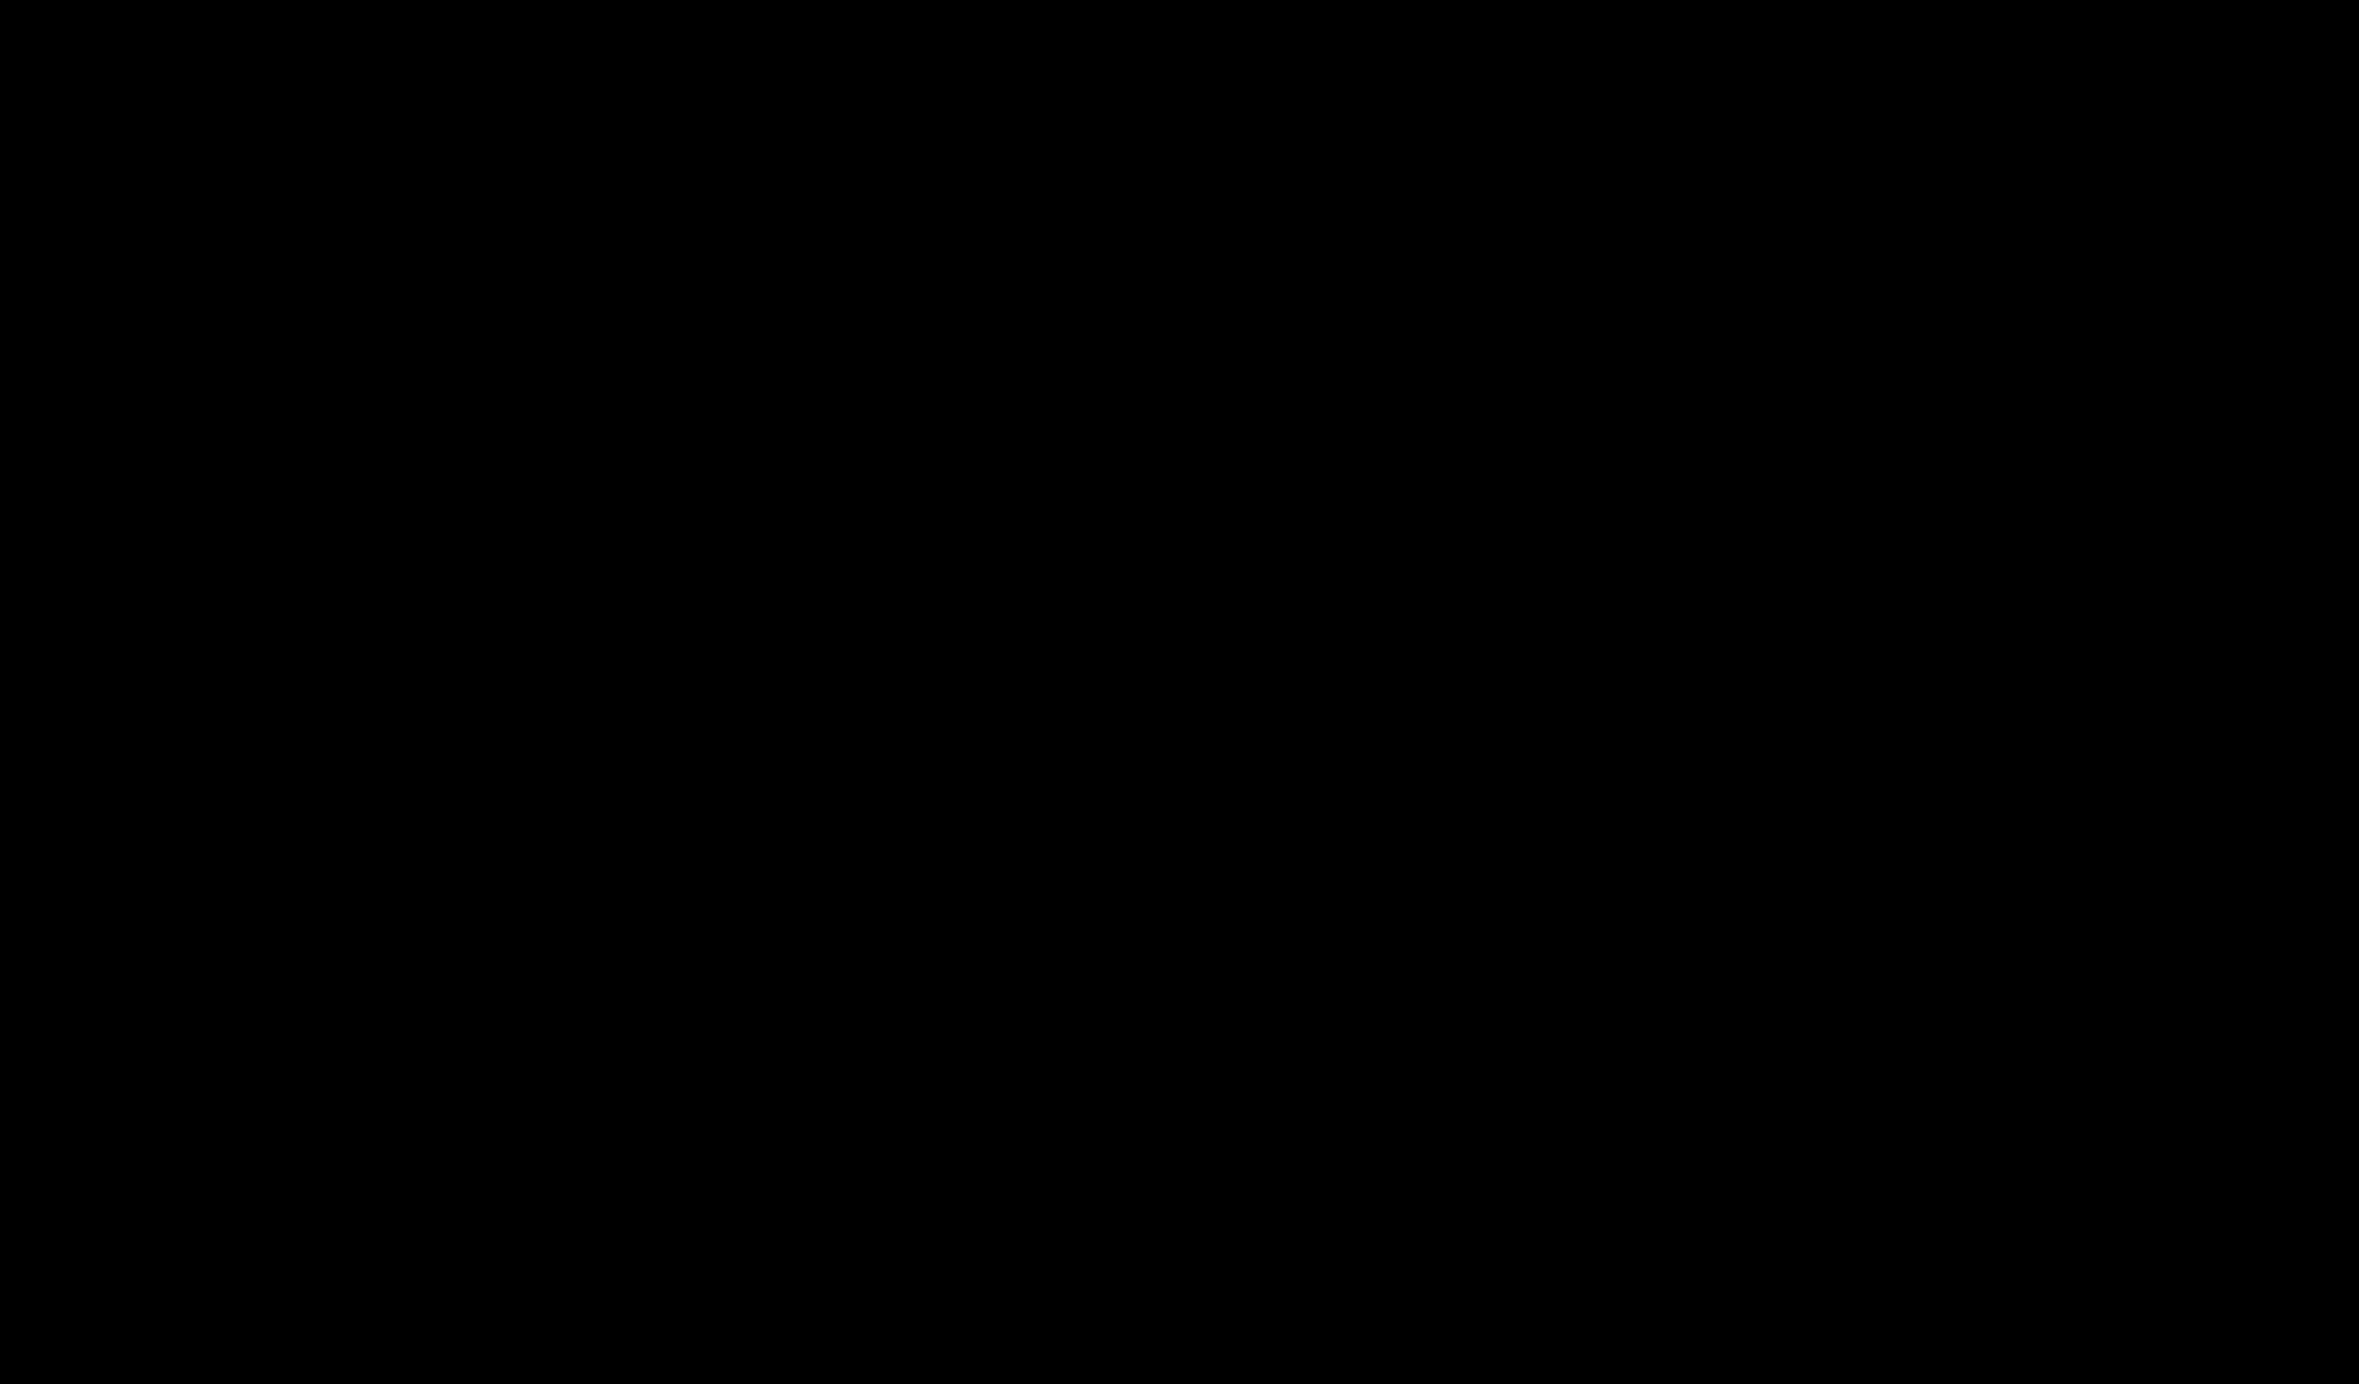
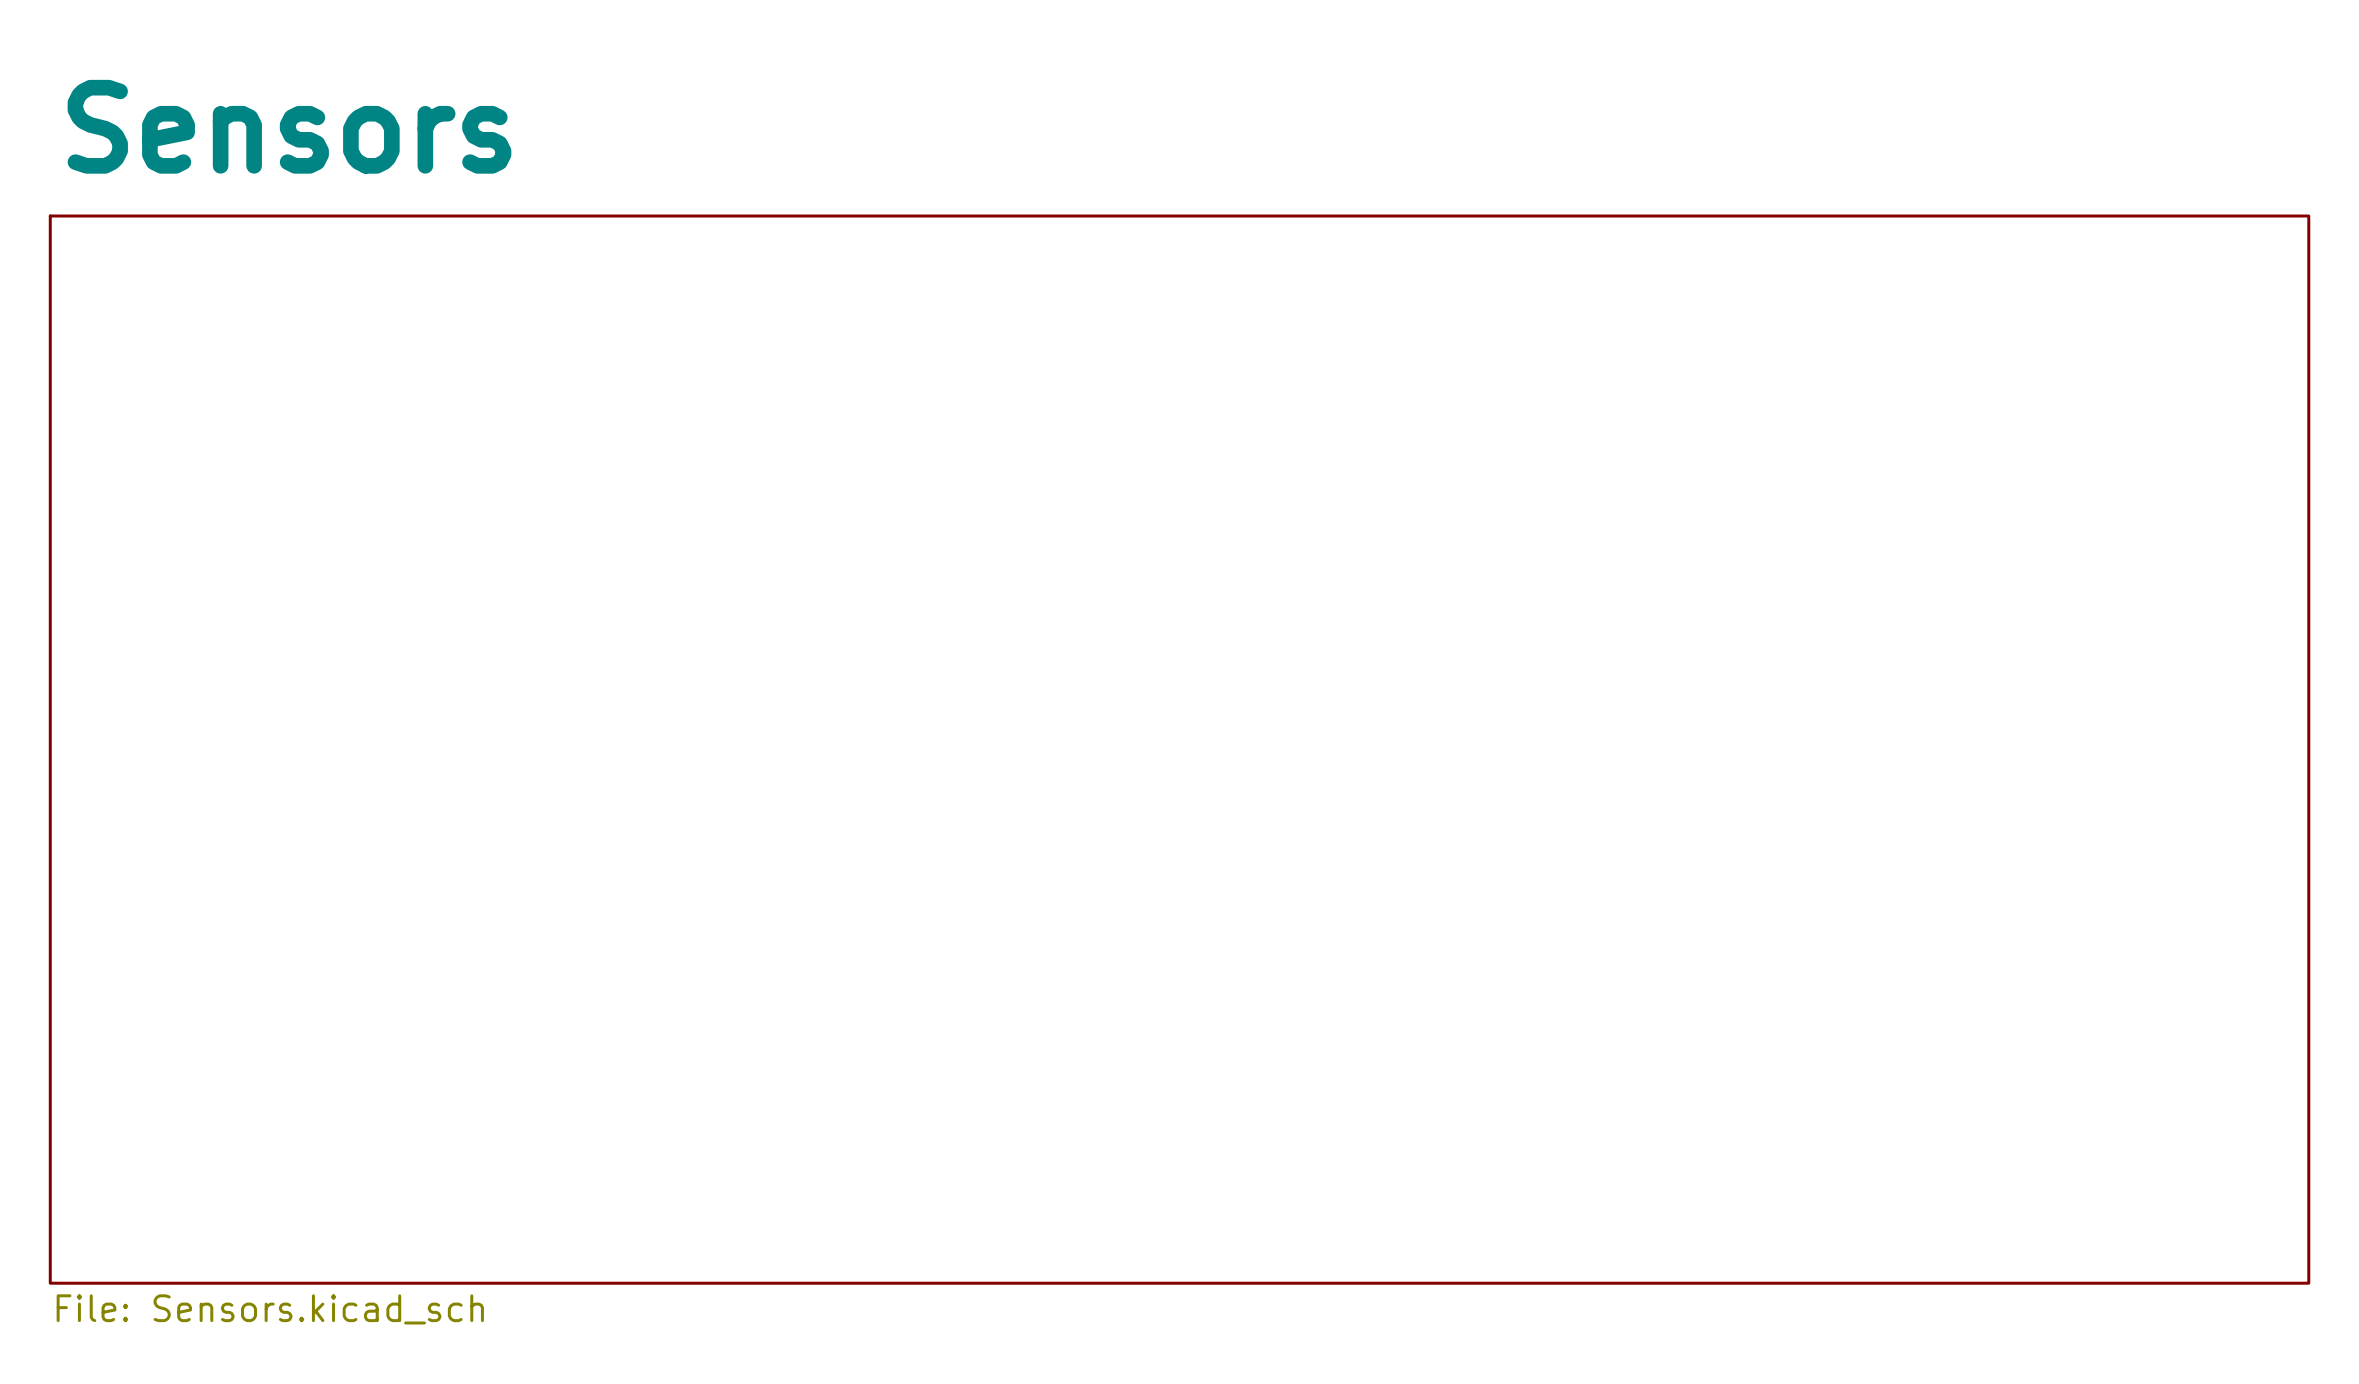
sheet Sensors: none -> File: Sensors.kicad_sch (1179, 749)

